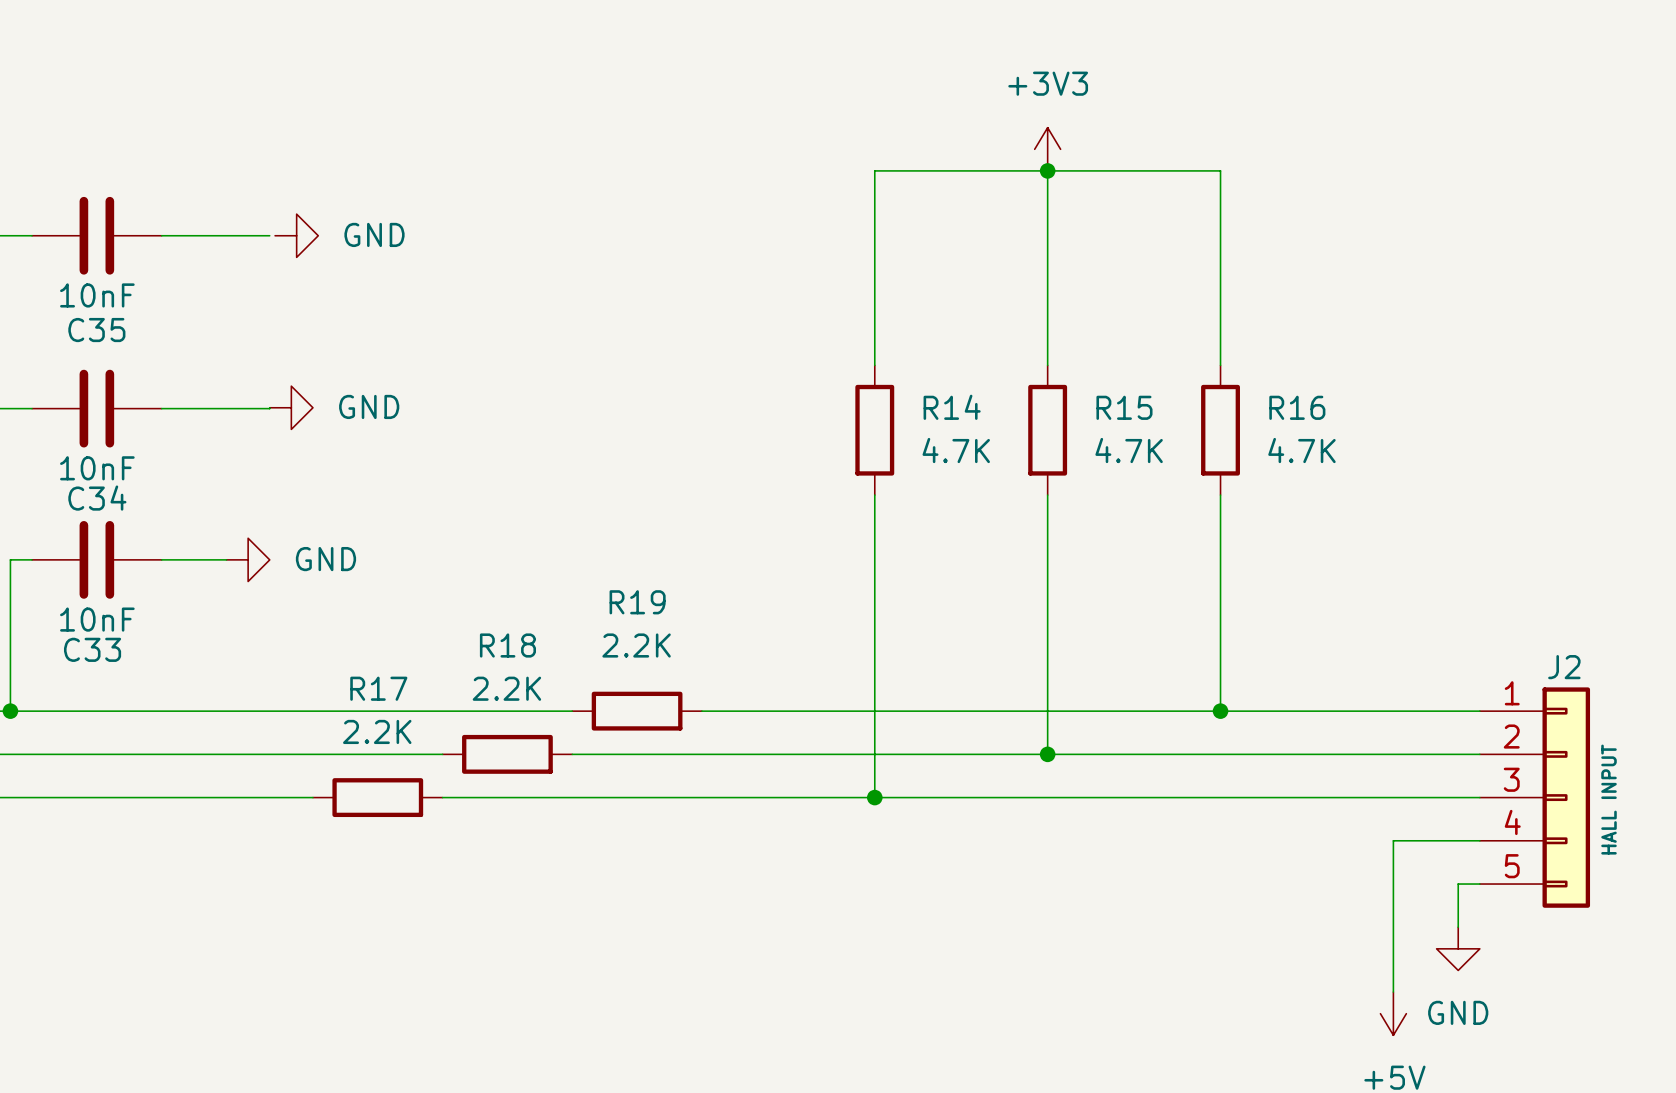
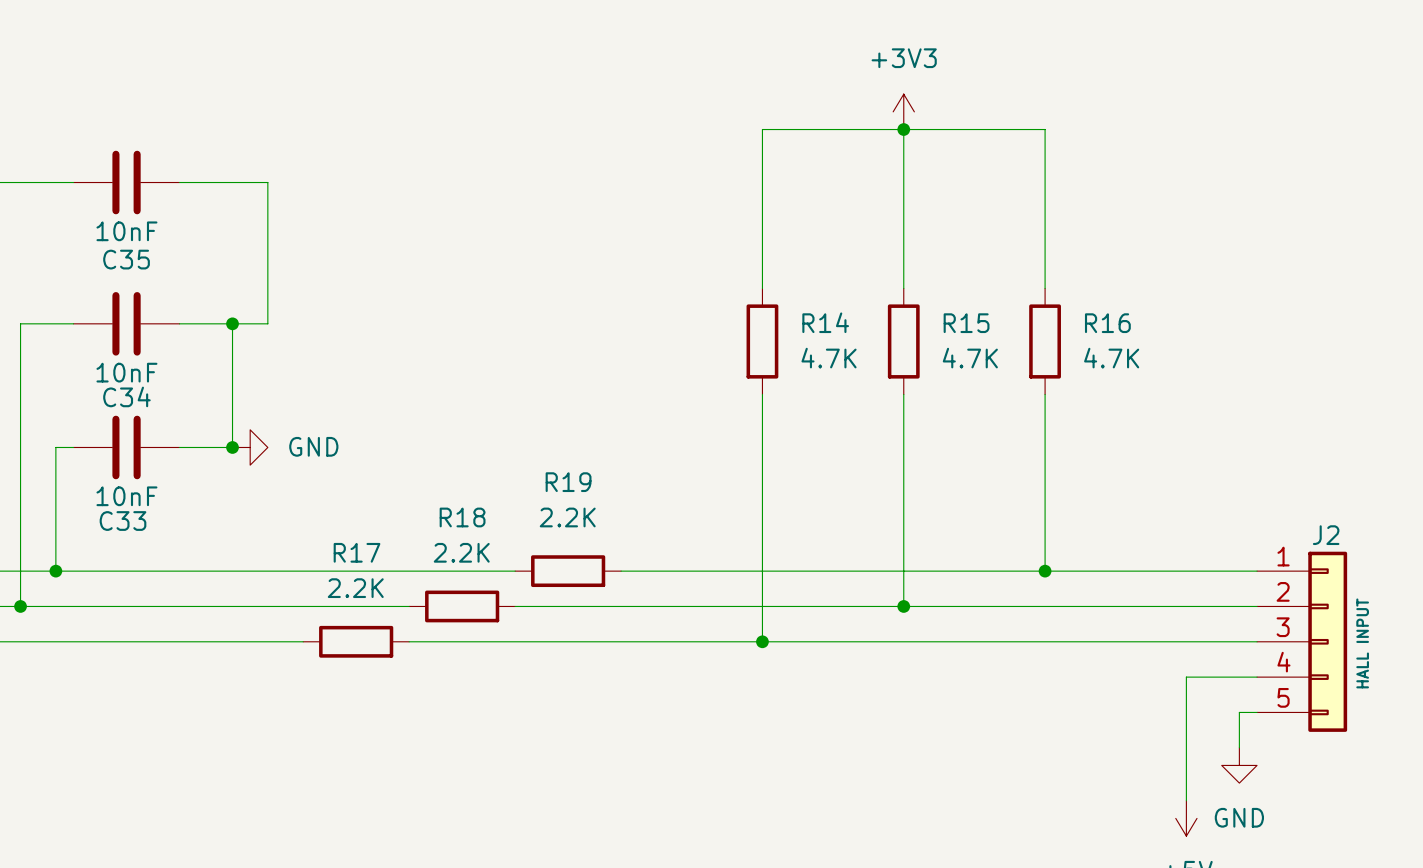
wire: none -> (267, 182) (267, 323)
power symbol: GND (296, 235) -> none
power symbol: GND (291, 407) -> none
wire: none -> (232, 323) (232, 447)
junction: none -> (232, 323)
junction: none -> (232, 447)

